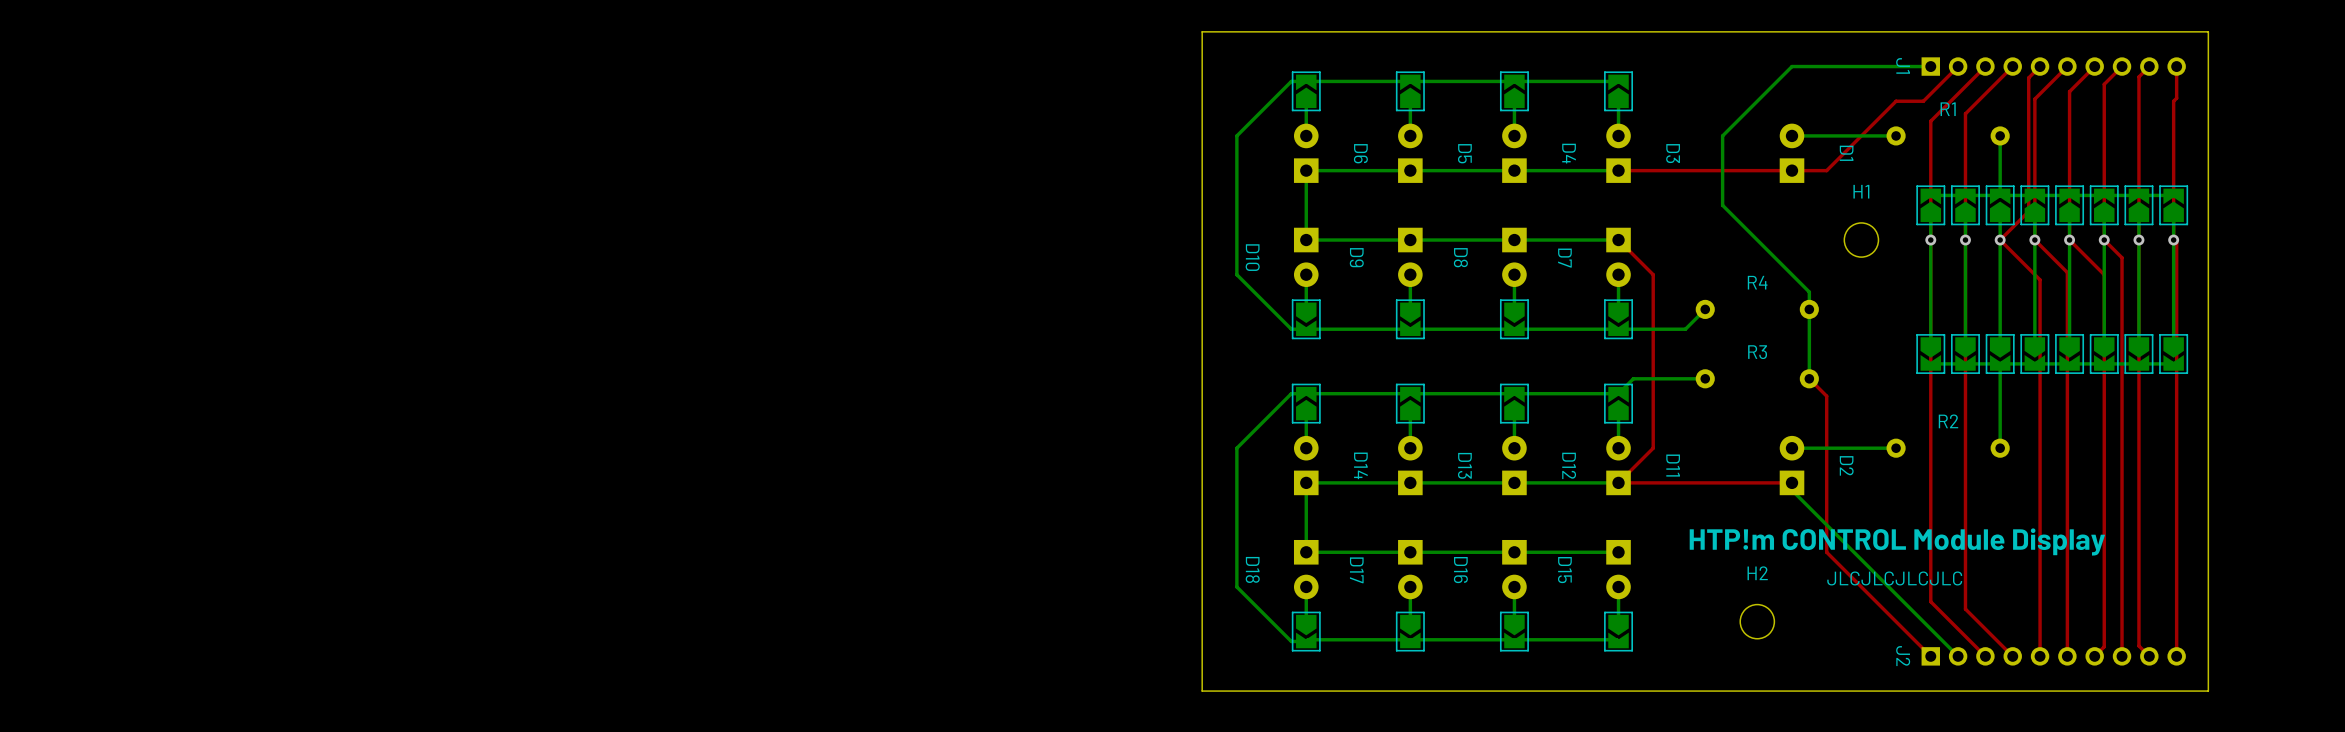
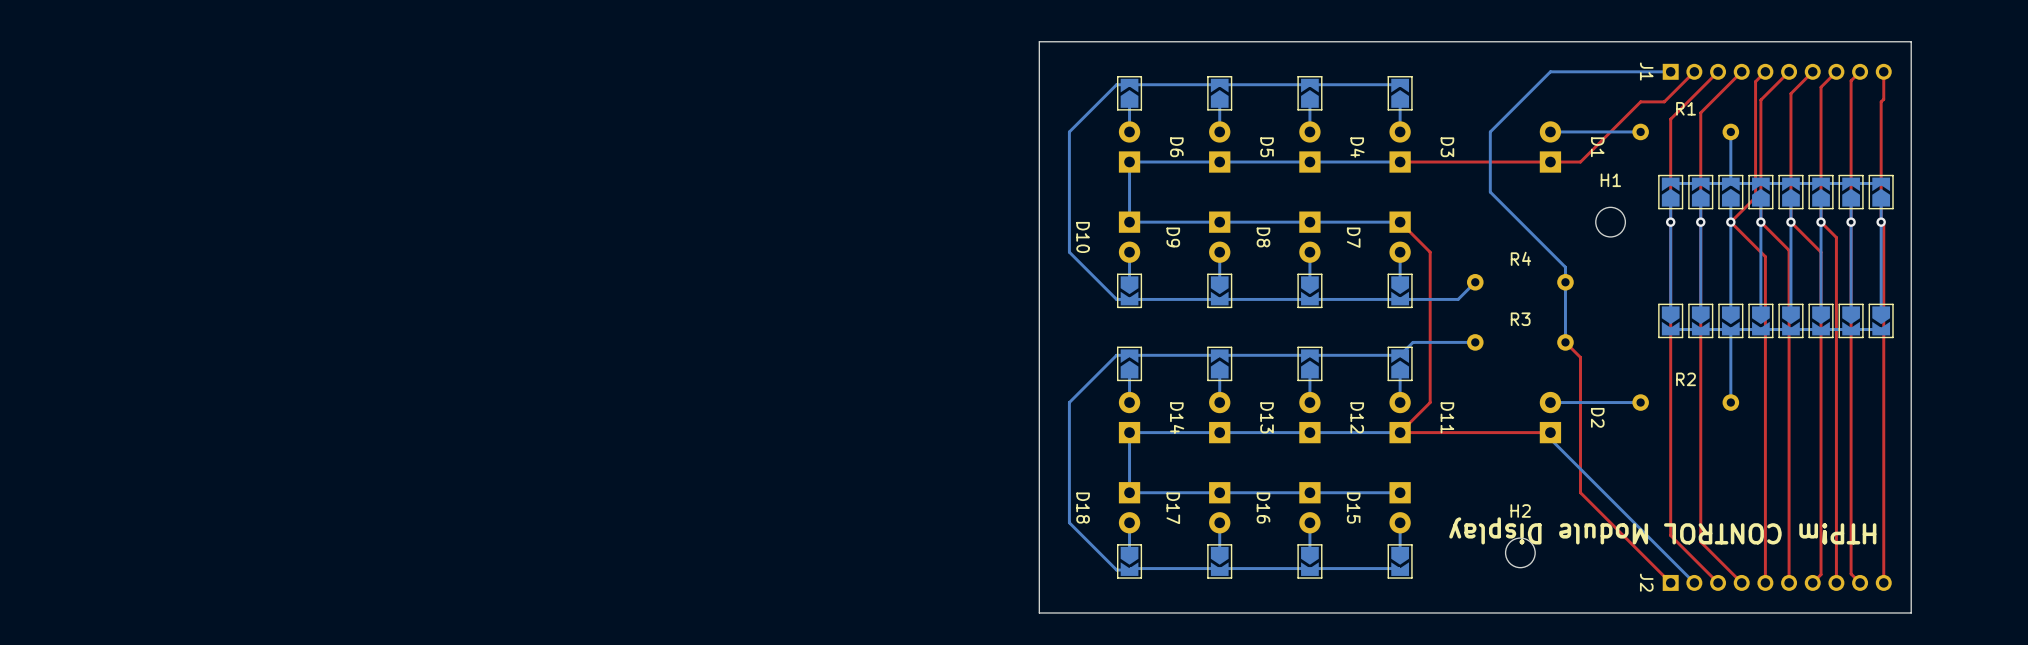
text: HTP!m CONTROL Module Display (1897, 542) -> none
text: JLCJLCJLCJLC (1894, 578) -> none
text: none -> HTP!m CONTROL Module Display (1662, 530)

